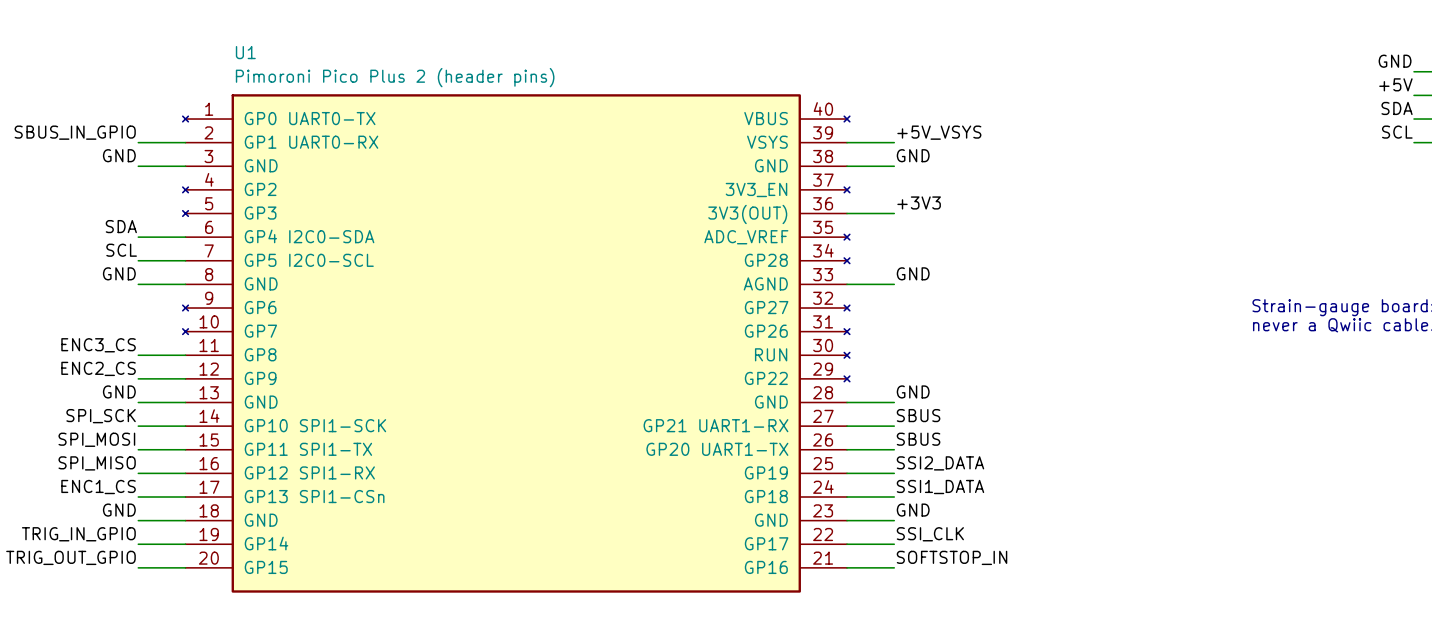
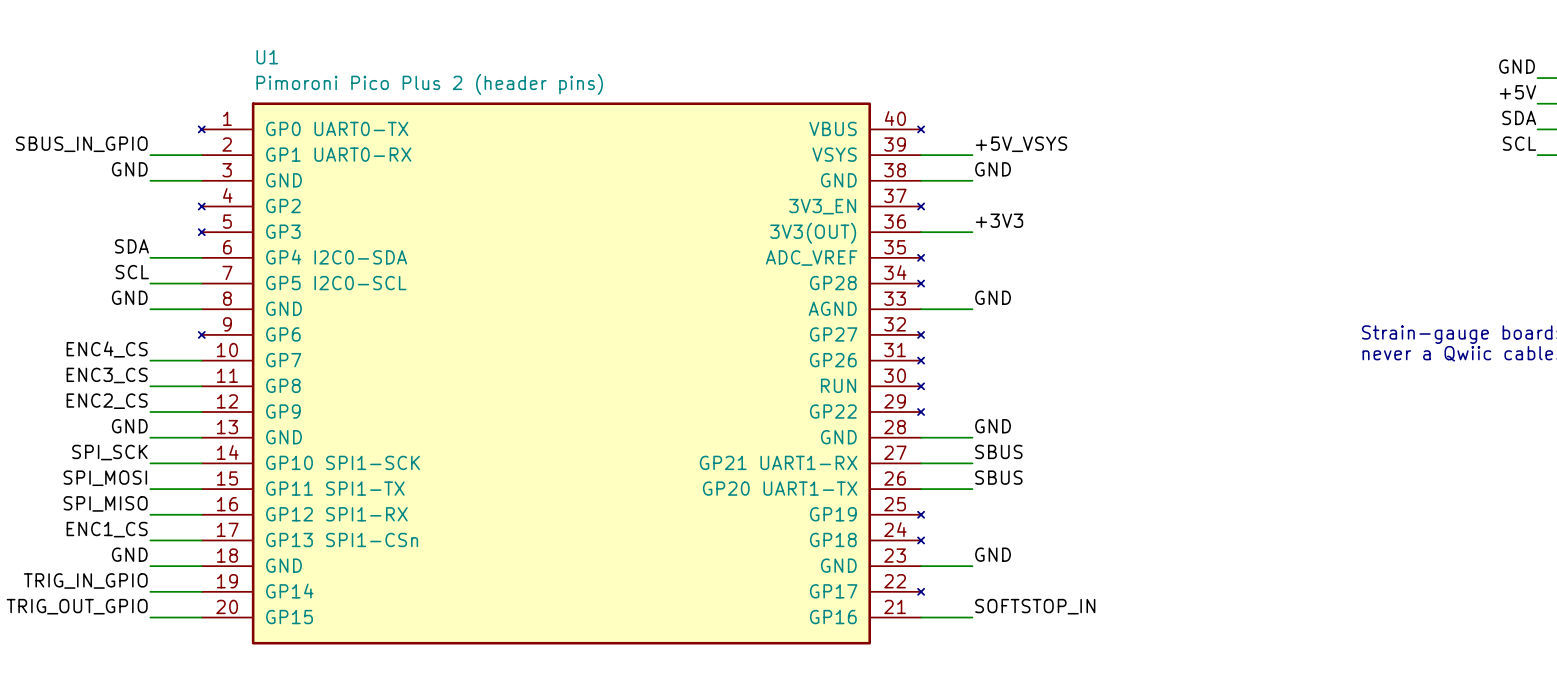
U1 symbol: [182, 94, 850, 593] -> [198, 102, 925, 645]
label: none -> ENC4_CS (107, 349)
wire: none -> (150, 360) (201, 360)
label: SSI2_DATA (940, 463) -> none
wire: (847, 473) (894, 473) -> none
label: SSI1_DATA (940, 487) -> none
wire: (847, 497) (894, 497) -> none
label: SSI_CLK (930, 534) -> none
wire: (847, 544) (894, 544) -> none

